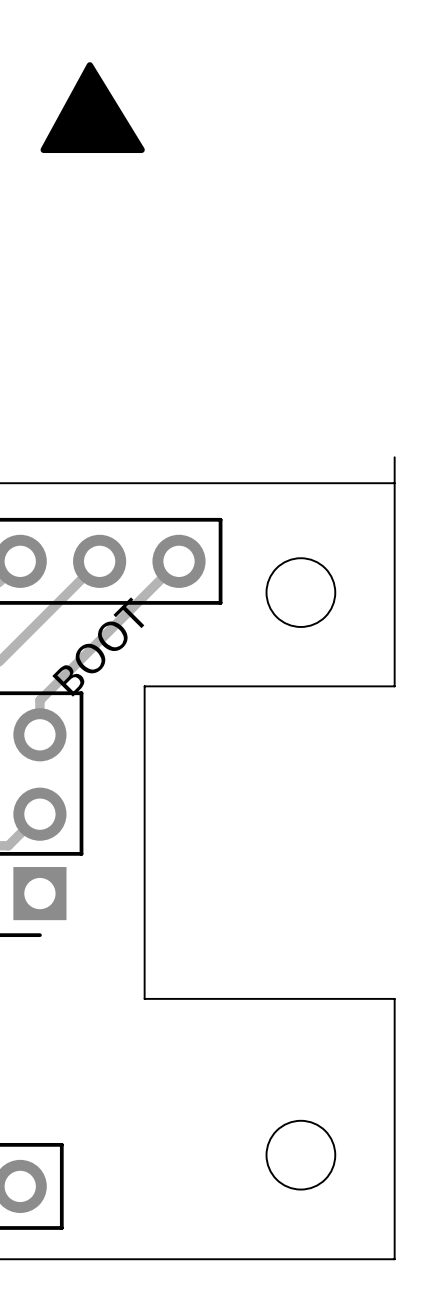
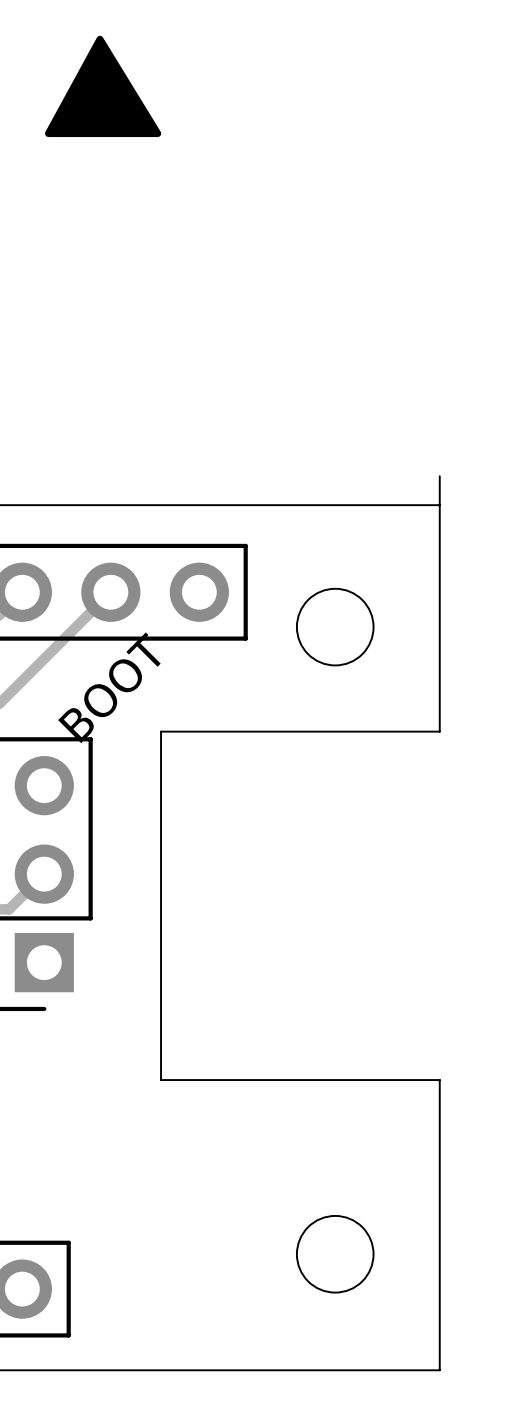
track: (179, 561) (39, 700) (39, 734) -> none

